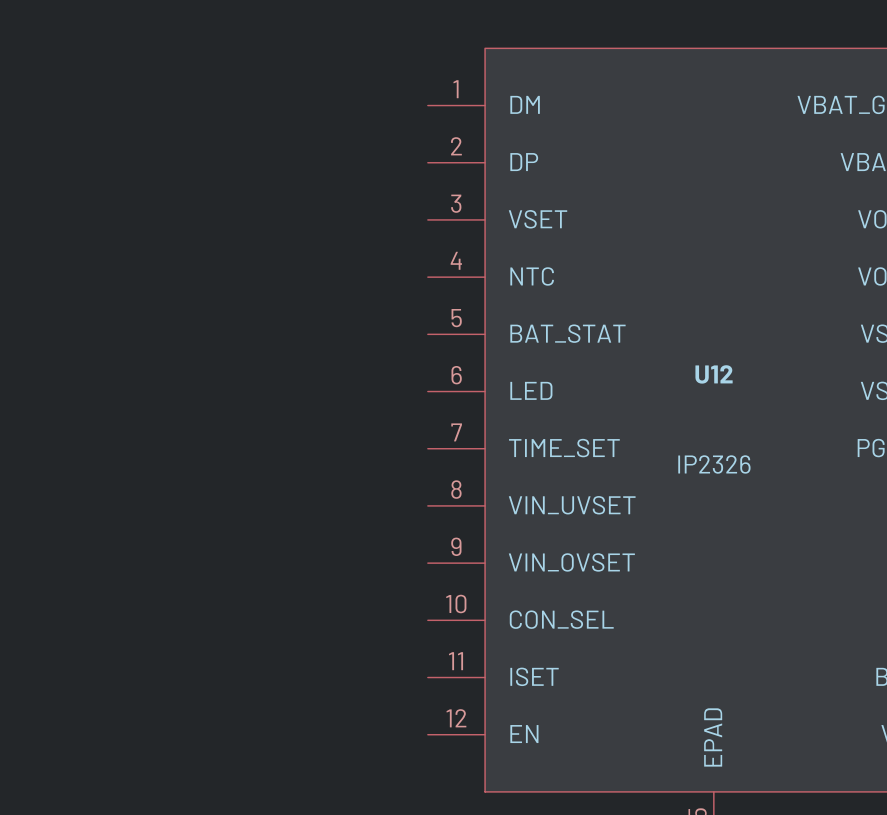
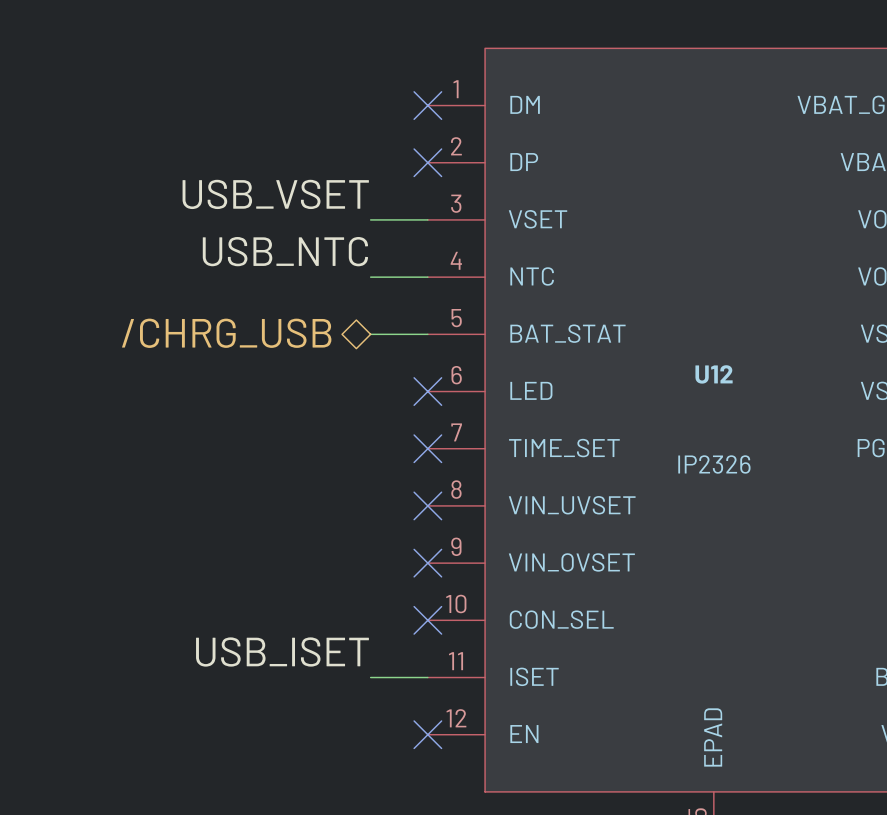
no-connect mark: none -> (427, 105)
no-connect mark: none -> (427, 162)
label: none -> USB_VSET (275, 194)
wire: none -> (370, 219) (427, 219)
label: none -> USB_NTC (285, 251)
wire: none -> (370, 277) (427, 277)
hierarchical label: none -> /CHRG_USB (226, 333)
wire: none -> (370, 334) (427, 334)
no-connect mark: none -> (427, 391)
no-connect mark: none -> (427, 448)
no-connect mark: none -> (427, 505)
no-connect mark: none -> (427, 563)
no-connect mark: none -> (427, 620)
label: none -> USB_ISET (282, 652)
wire: none -> (370, 677) (427, 677)
no-connect mark: none -> (427, 734)

